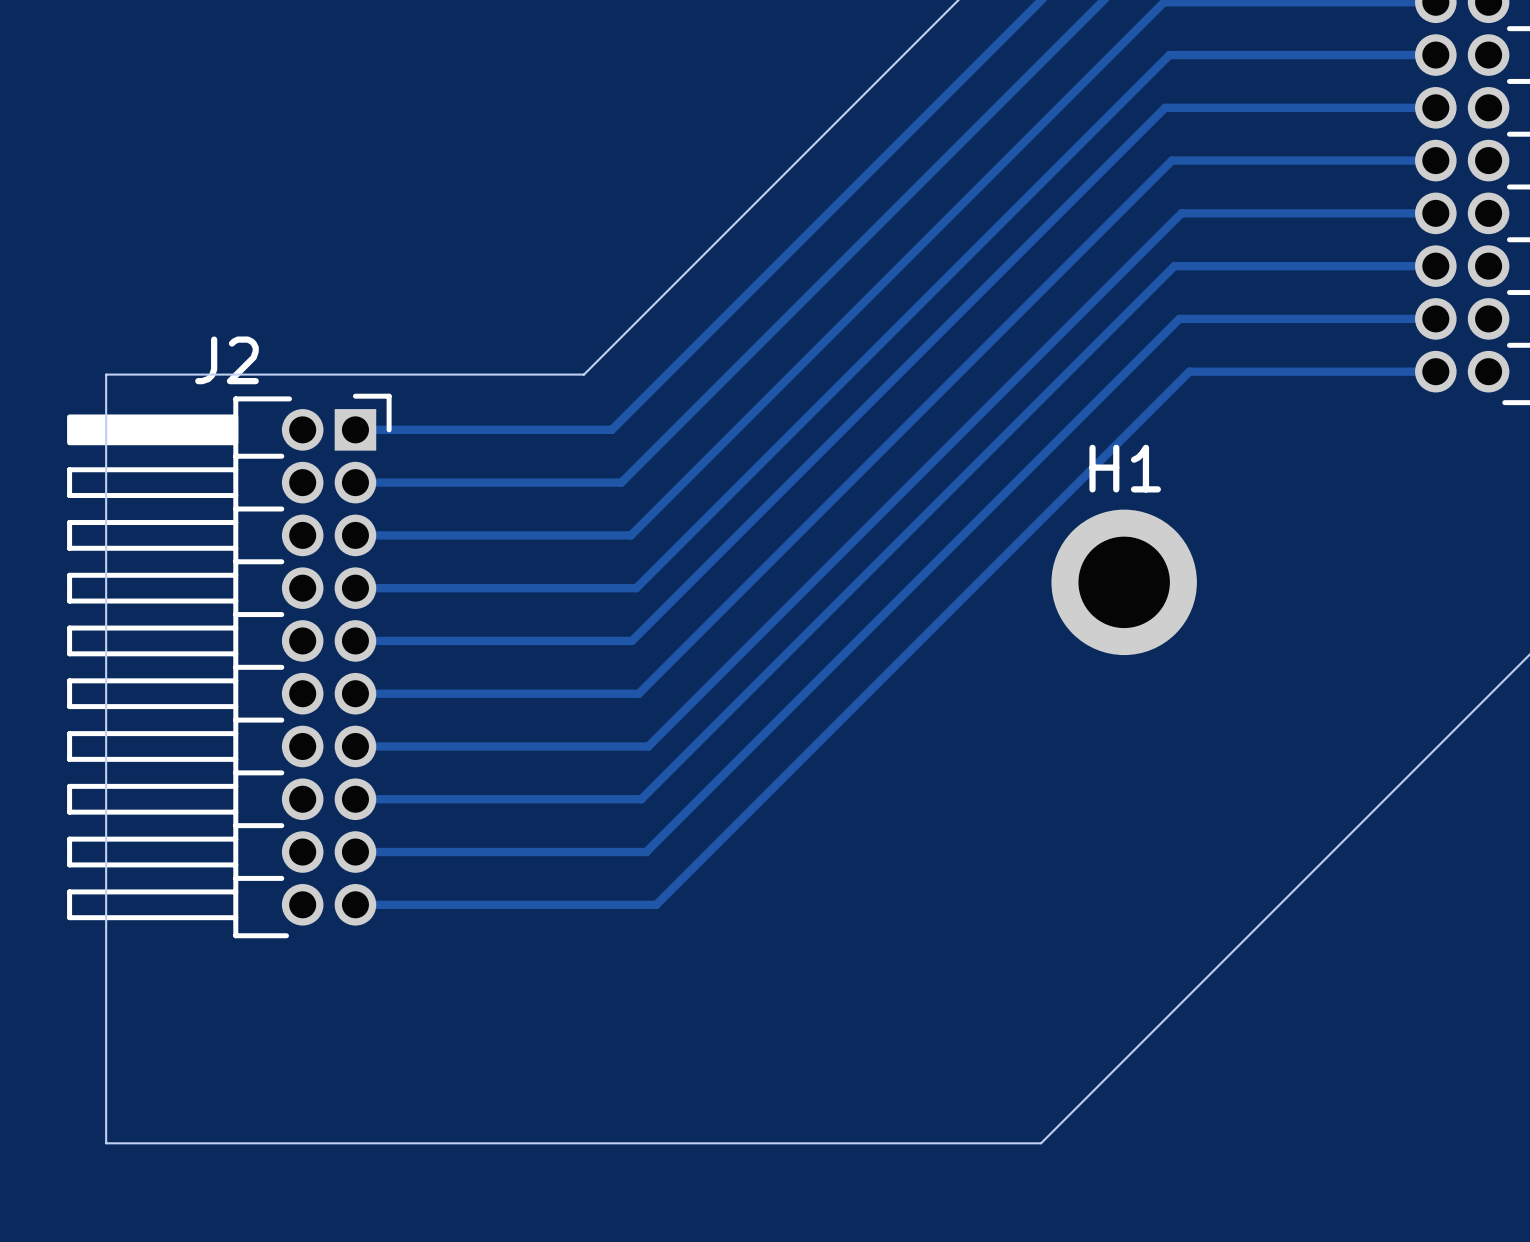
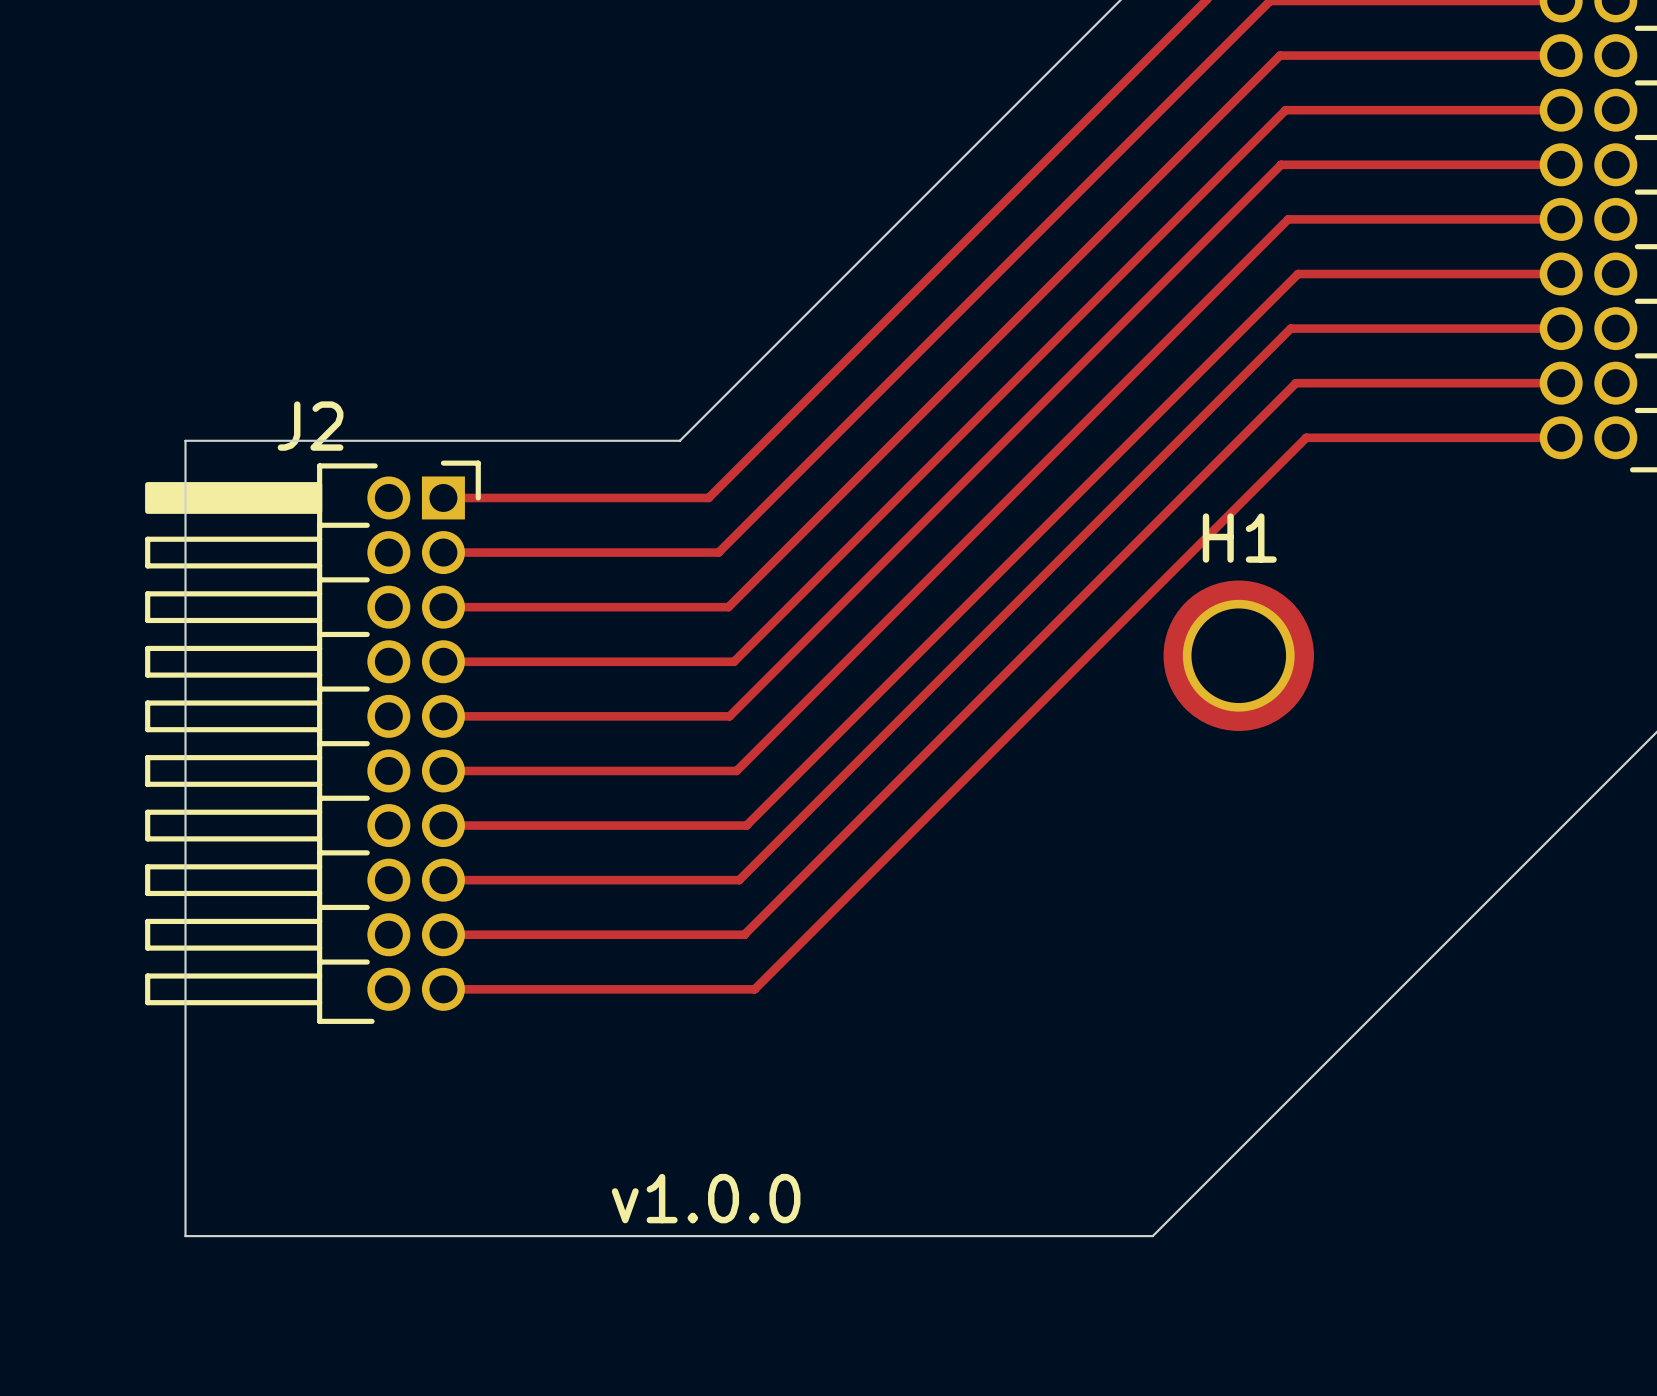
text: none -> v1.0.0 (706, 1198)

